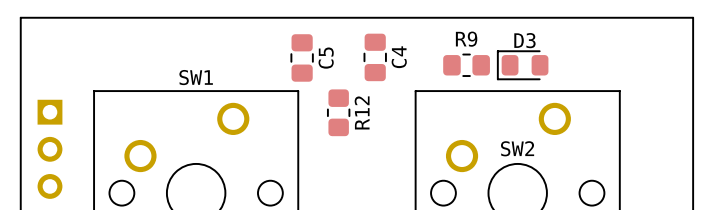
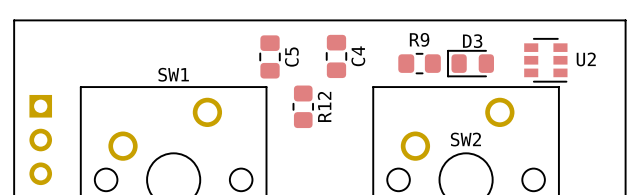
U2: none -> (545, 60)

